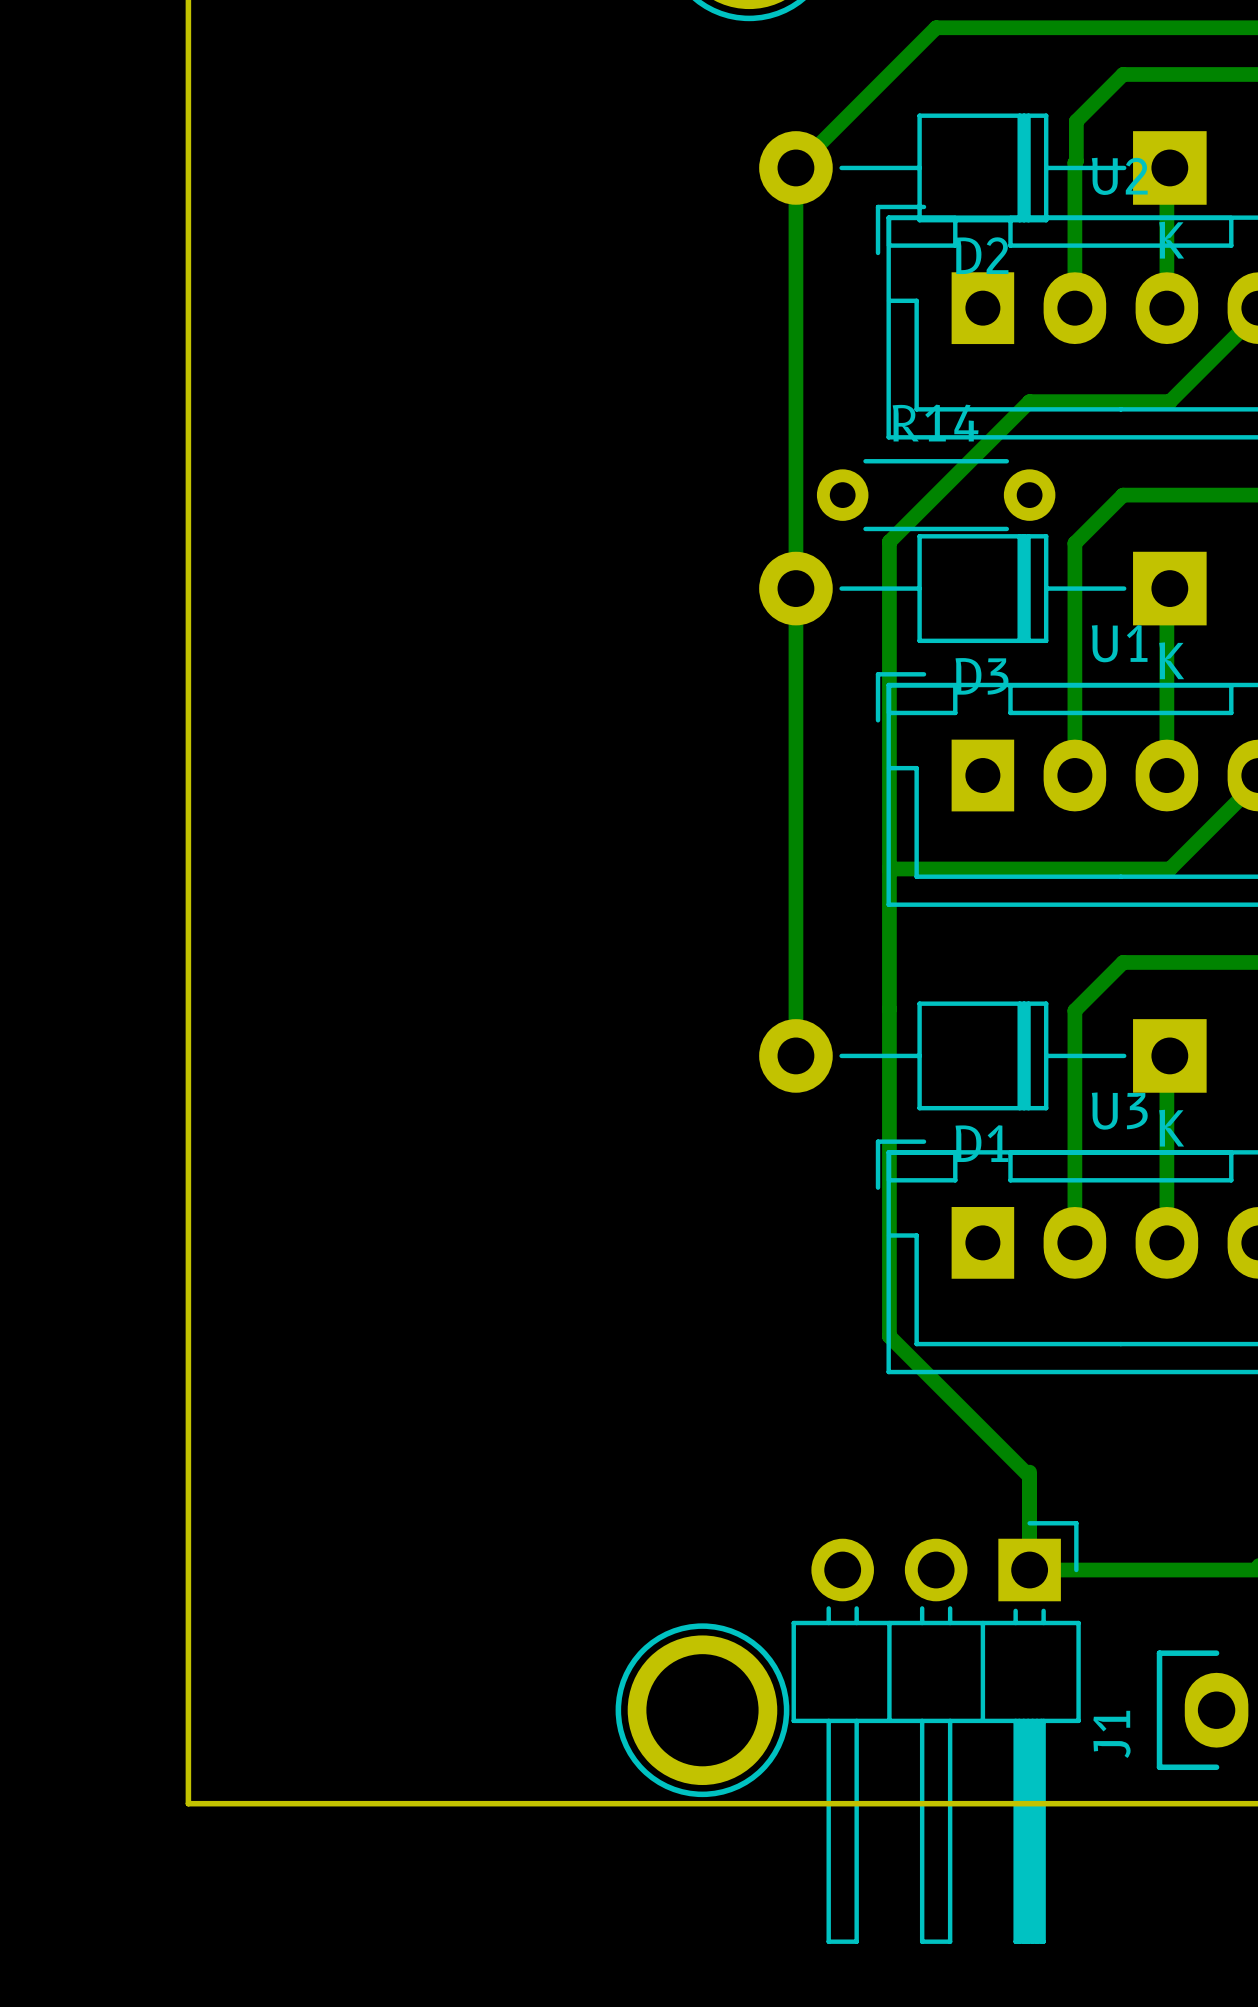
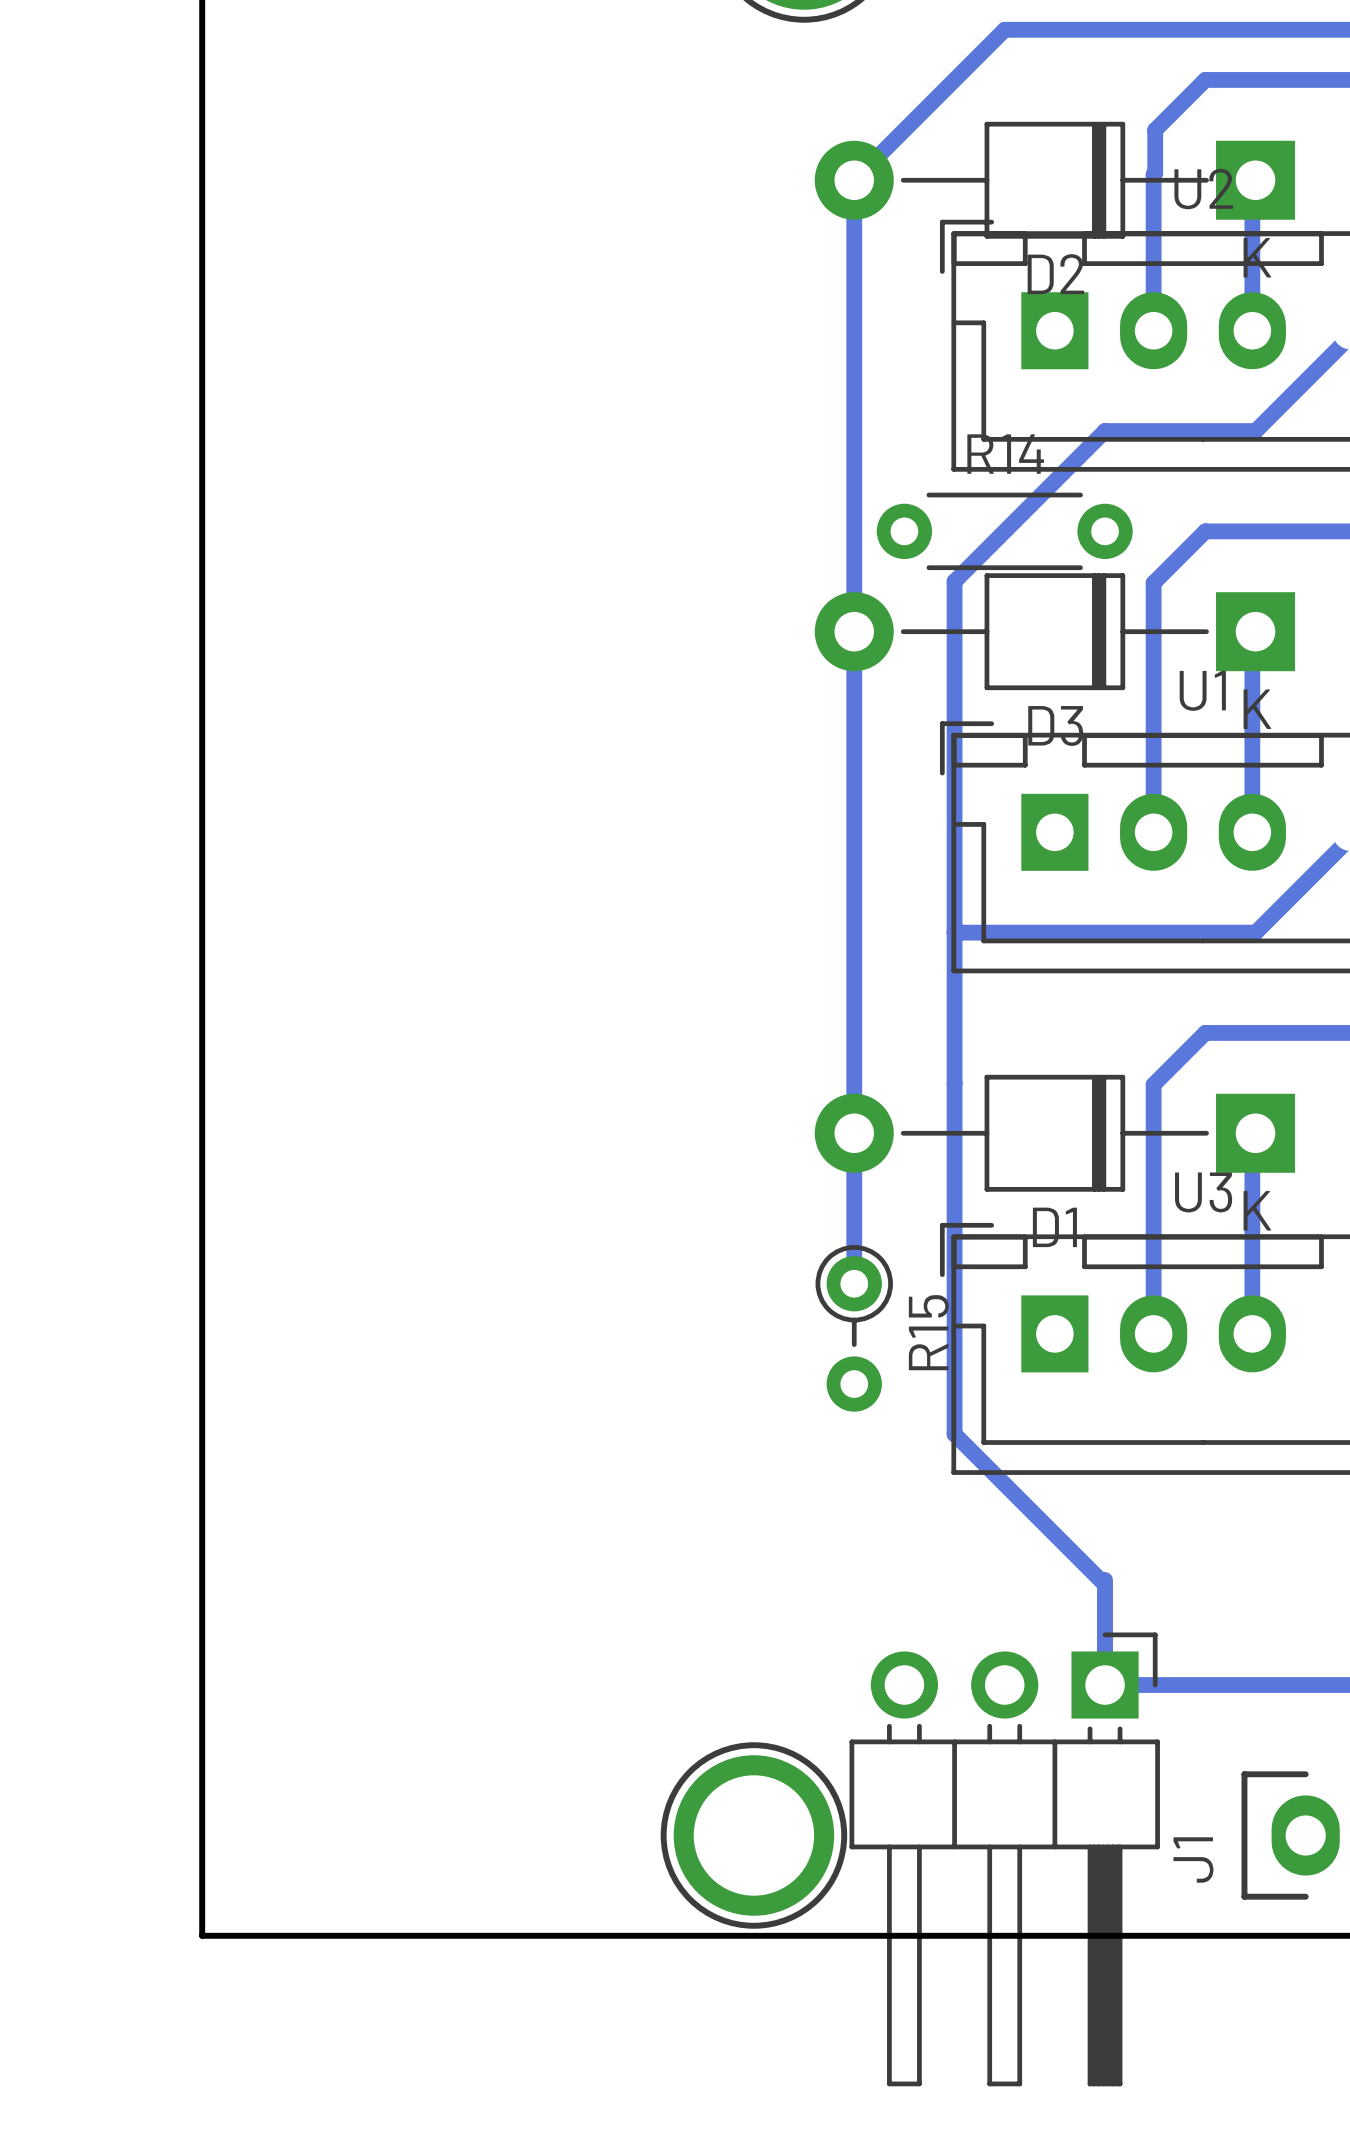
bottom track: none -> (854, 1133) (854, 1283)
R15: none -> (854, 1328)

